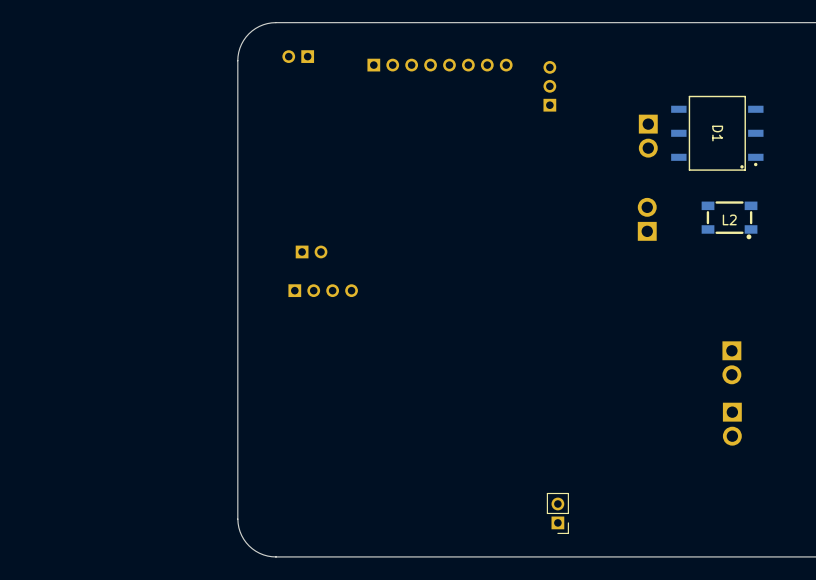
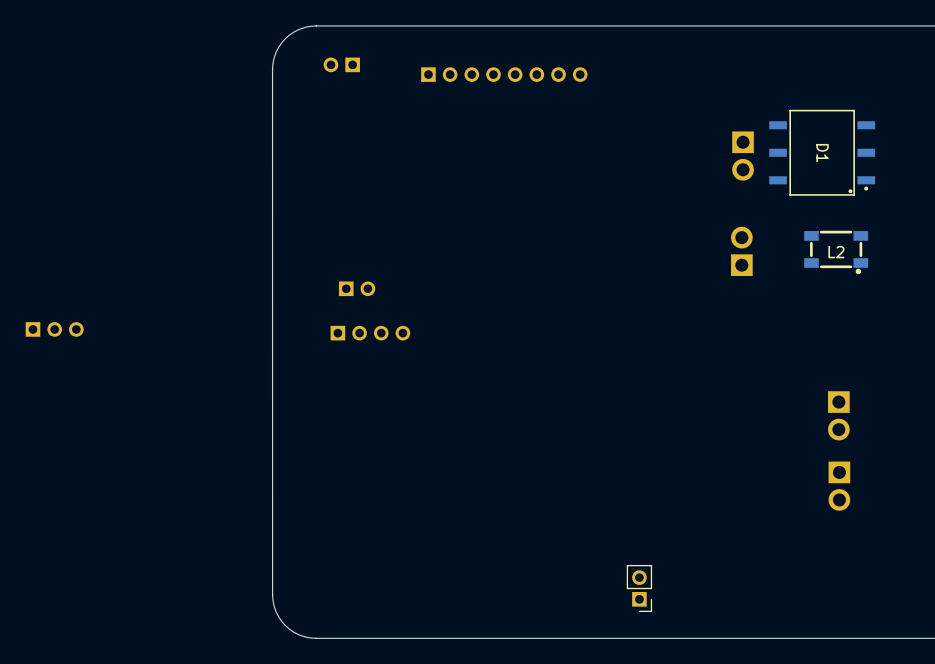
part: (549, 86) -> none
part: none -> (54, 329)

